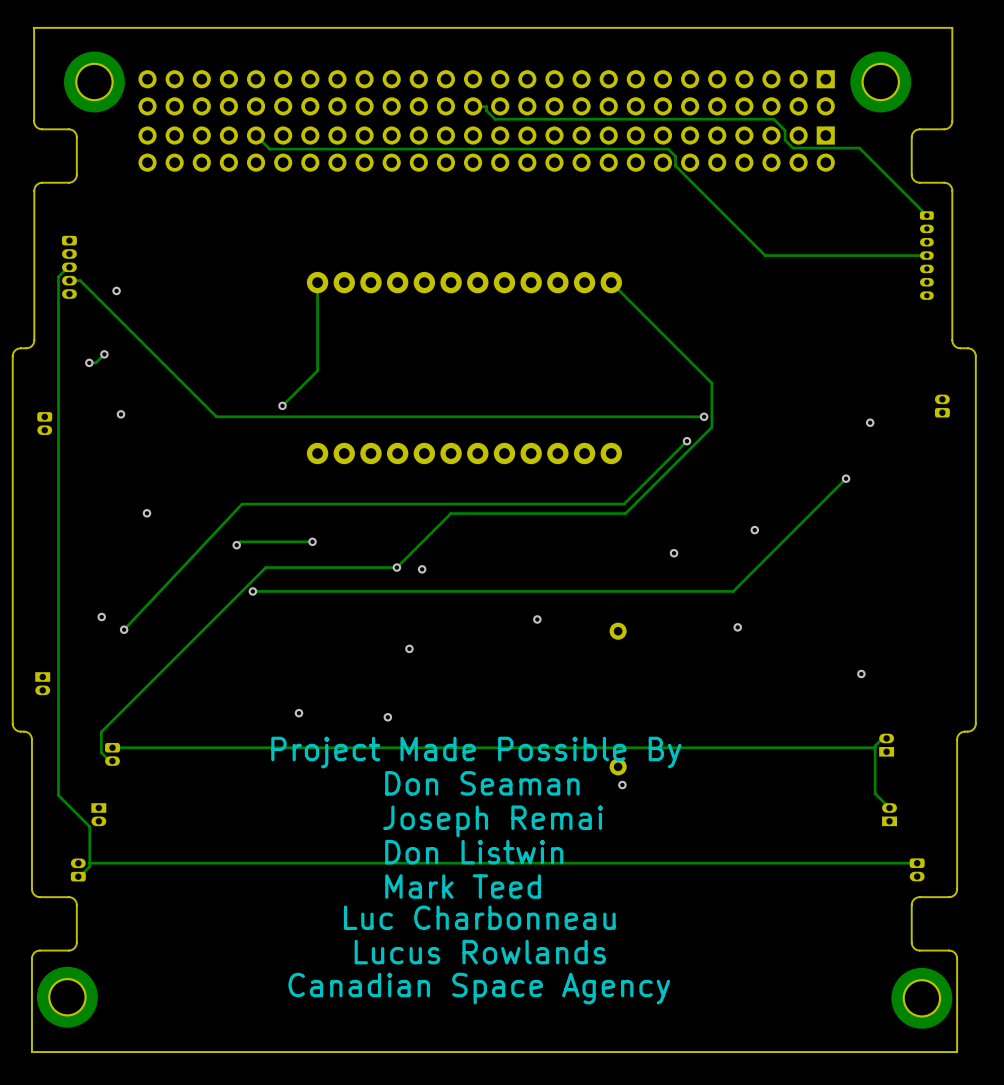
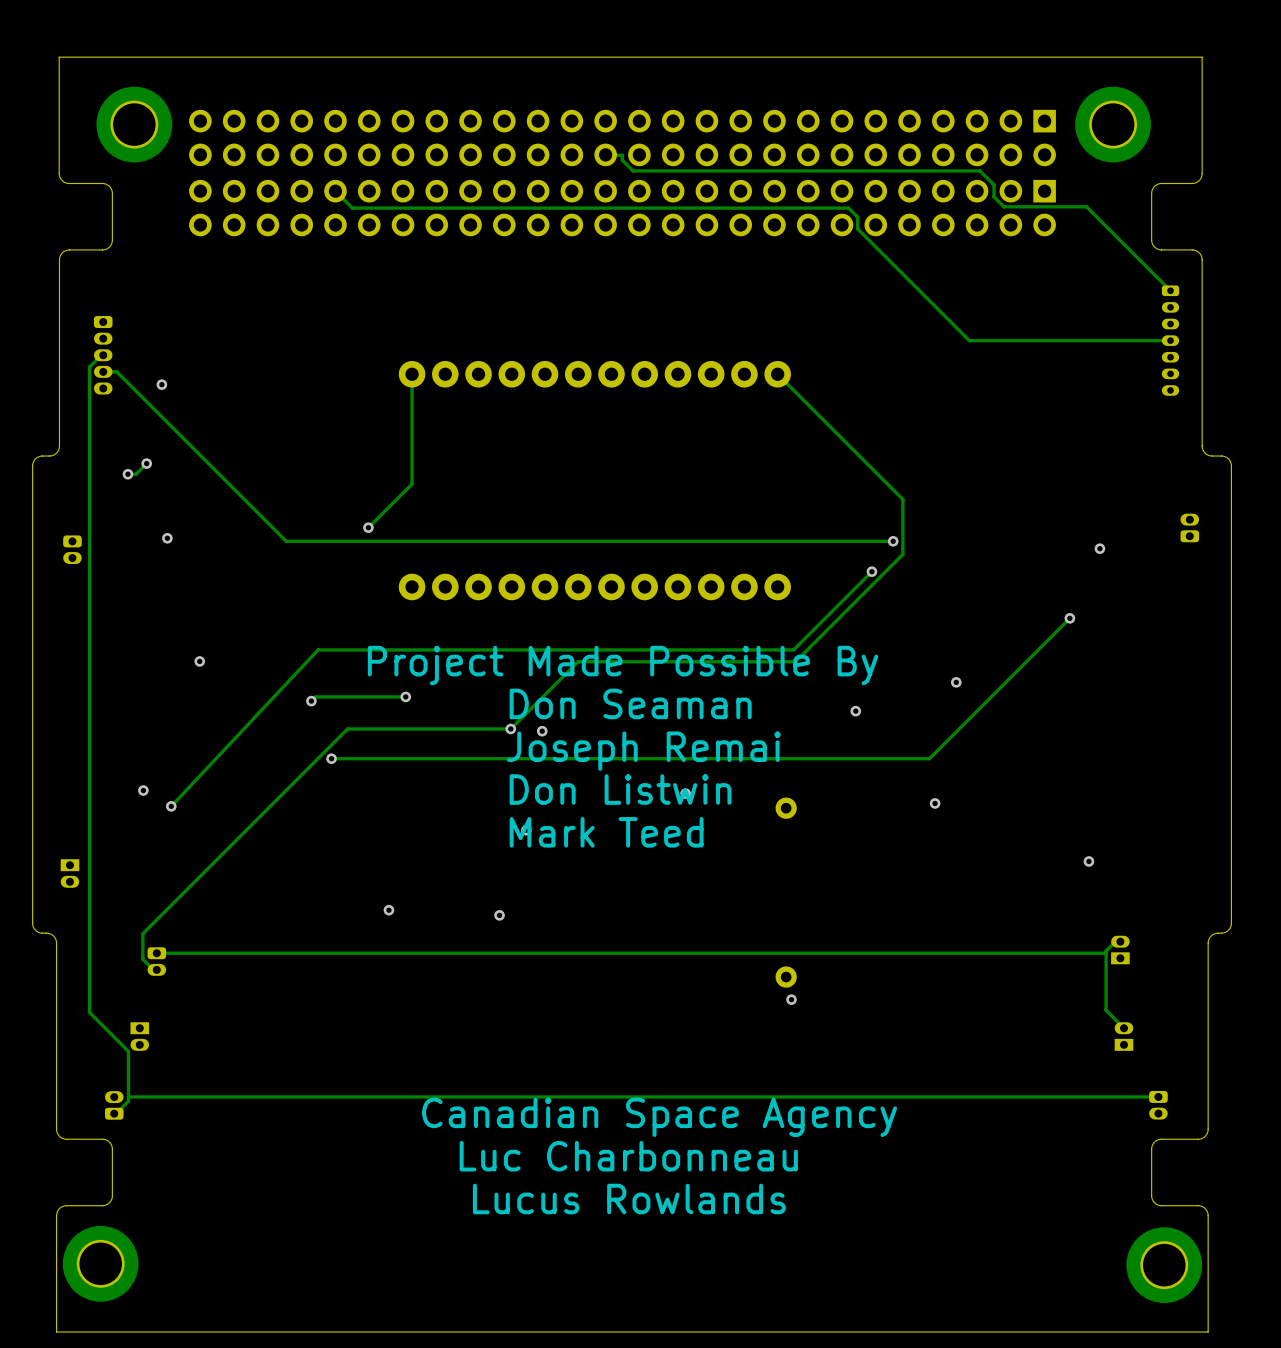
text position: Project Made Possible By (476, 752) -> Project Made Possible By (623, 665)
text position: Don Seaman (482, 783) -> Don Seaman (630, 703)
text position: Joseph Remai (493, 821) -> Joseph Remai (643, 751)
text position: Don Listwin (474, 852) -> Don Listwin (620, 789)
text position: Mark Teed (463, 886) -> Mark Teed (606, 832)
text position: Luc Charbonneau (479, 917) -> Luc Charbonneau (628, 1156)
text position: Lucus Rowlands (480, 952) -> Lucus Rowlands (629, 1199)
text position: Canadian Space Agency (479, 988) -> Canadian Space Agency (659, 1117)

